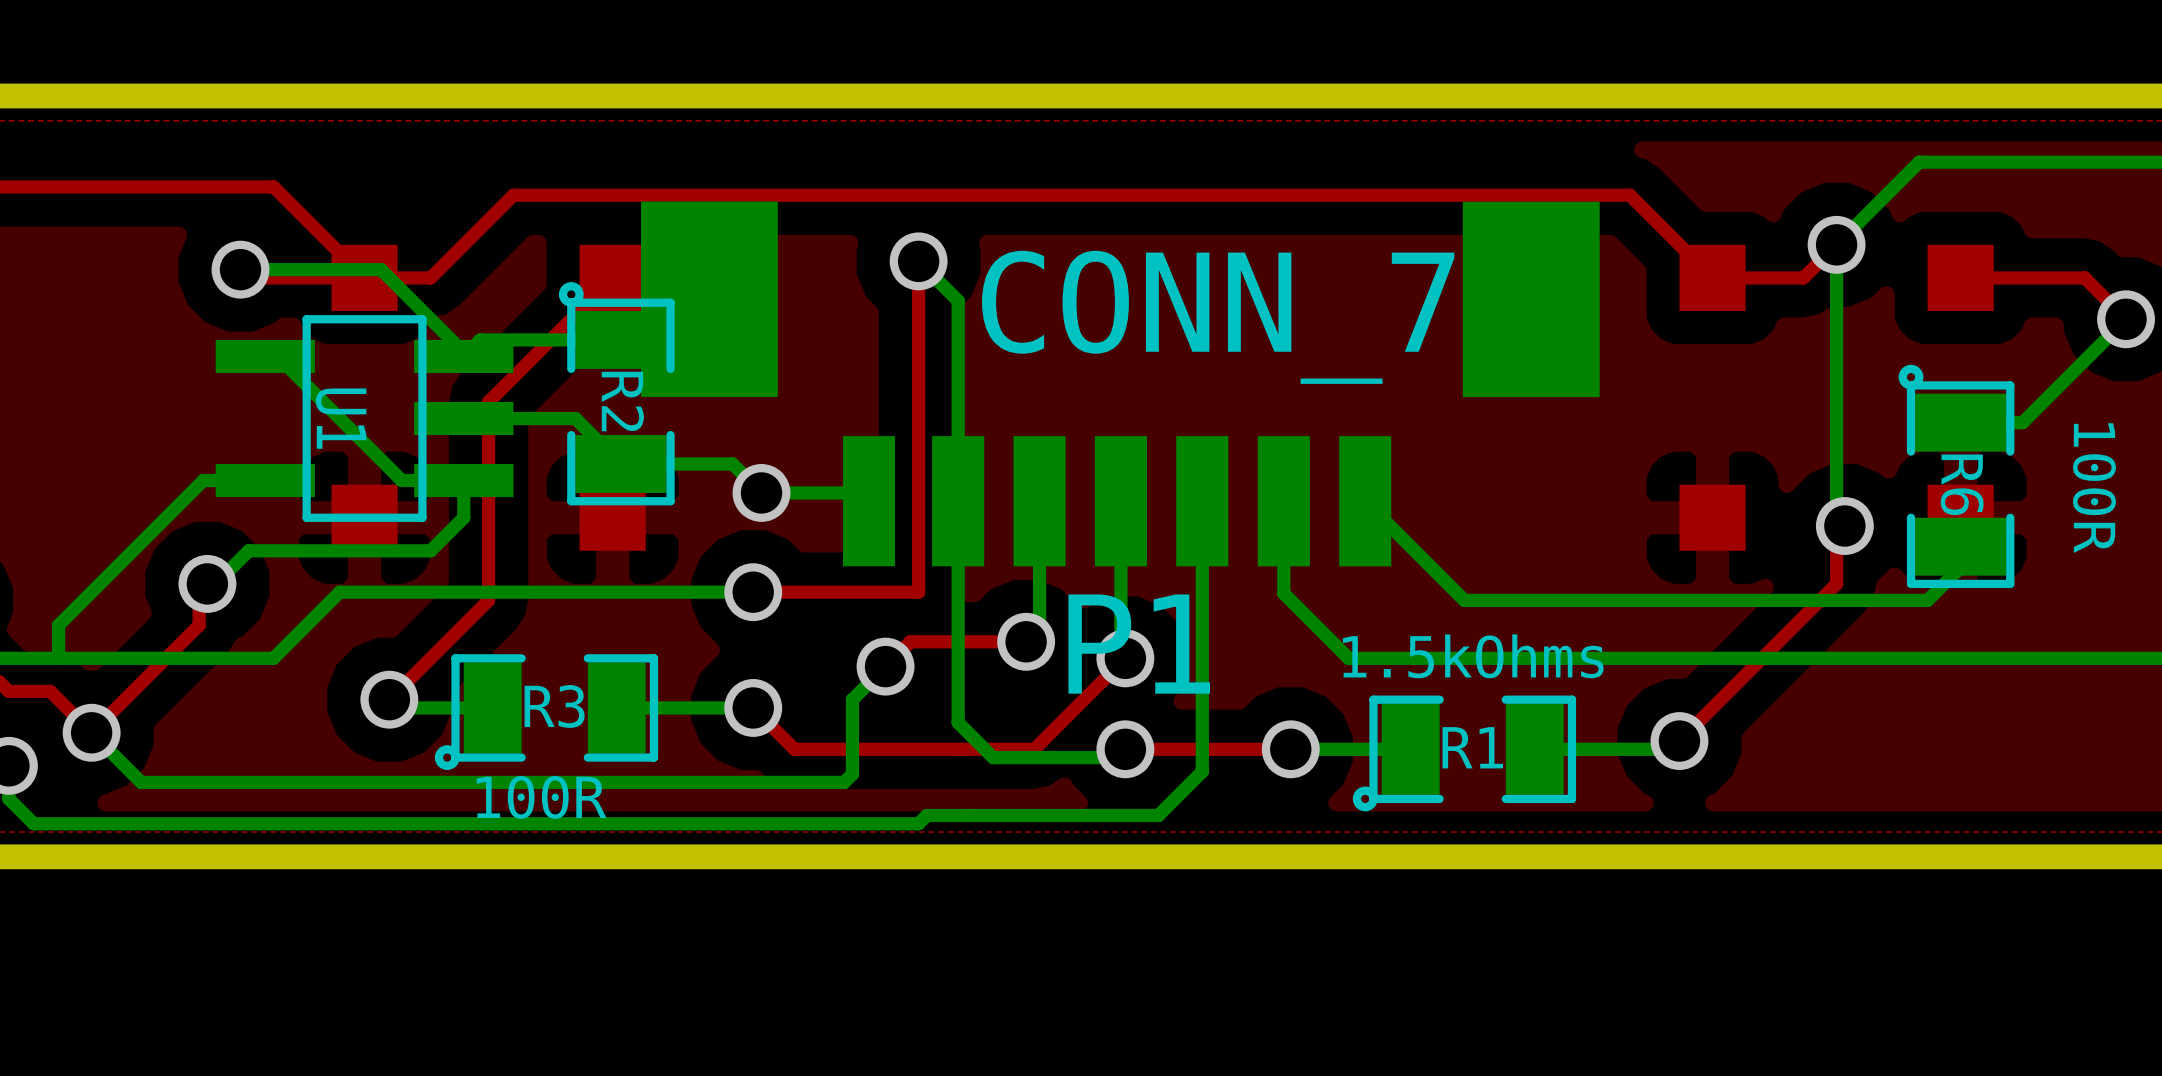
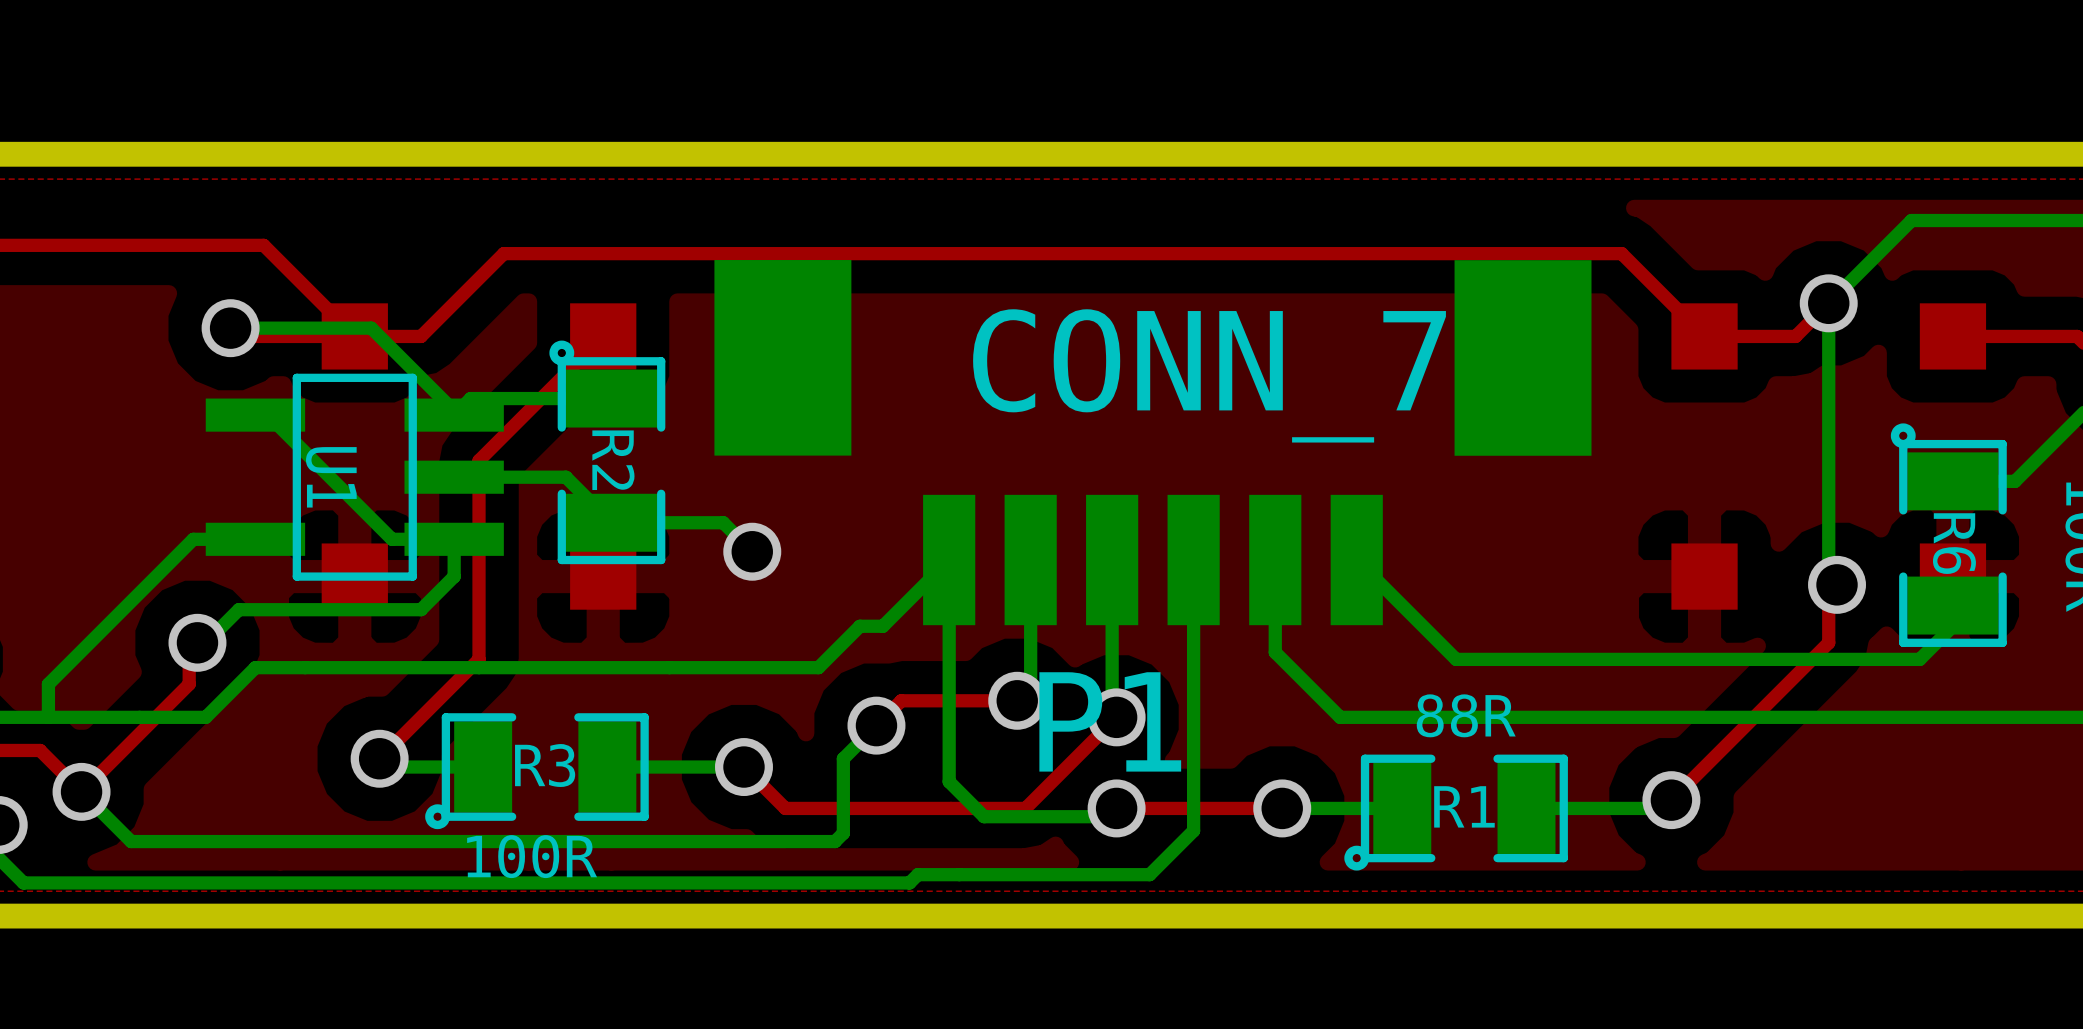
P1 footprint: [641, 201, 1600, 567] -> [714, 260, 1592, 626]
bottom track: (918, 261) (958, 300) (958, 501) -> none
top track: (918, 261) (918, 592) (753, 592) -> none
via: (918, 261) -> none
bottom track: (761, 492) (860, 492) (869, 501) -> none
bottom track: (753, 592) (339, 592) (273, 658) (215, 658) -> (949, 560) (882, 626) (859, 626) (818, 667) (255, 667) (205, 717)
via: (753, 592) -> none
R1 value: 1.5kOhms (1473, 656) -> 88R (1466, 715)

